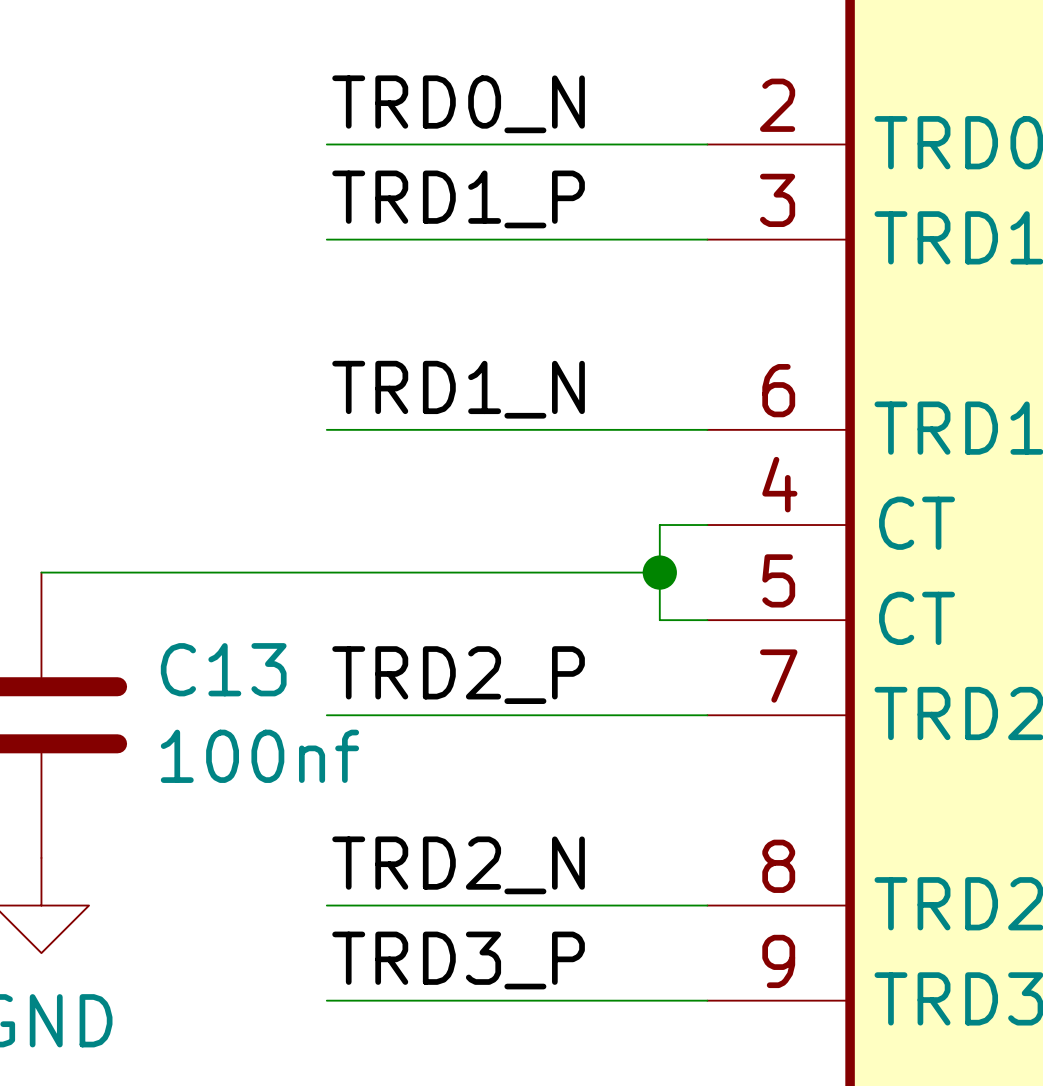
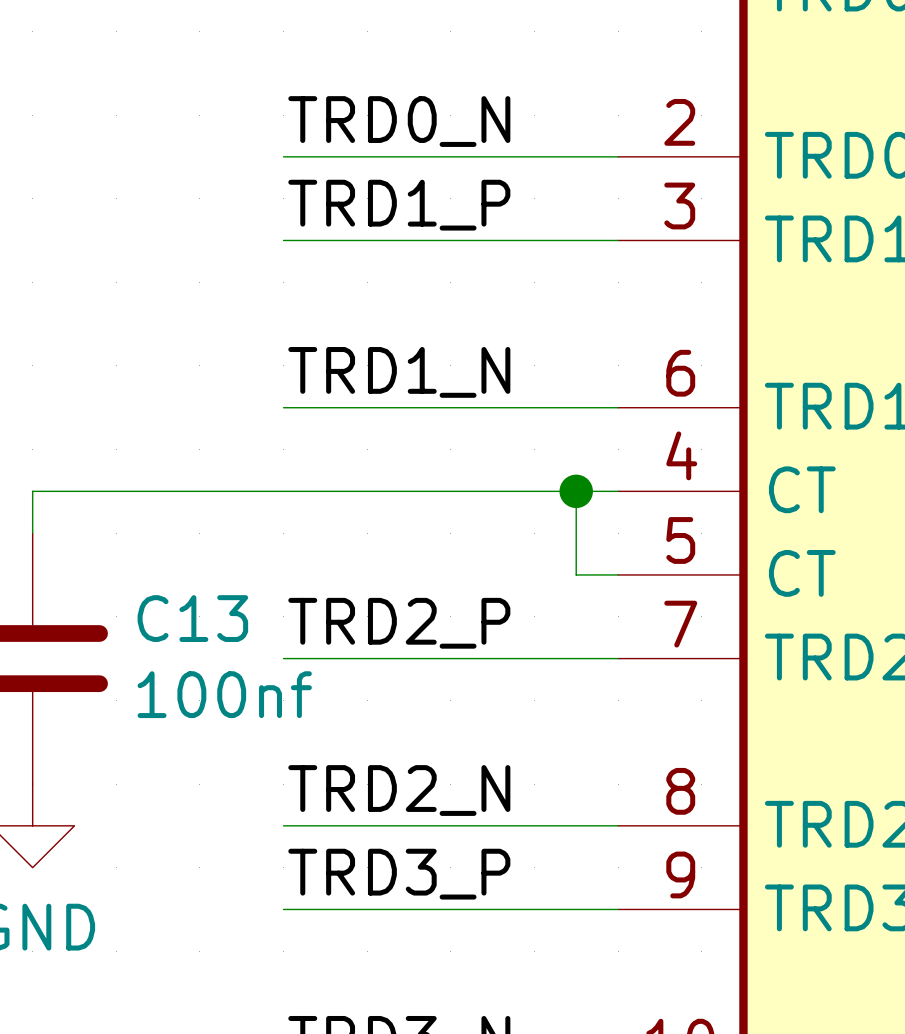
junction: none -> (576, 491)
wire: (41, 572) (659, 572) -> (32, 533) (32, 491) (576, 491)
junction: (659, 572) -> none

